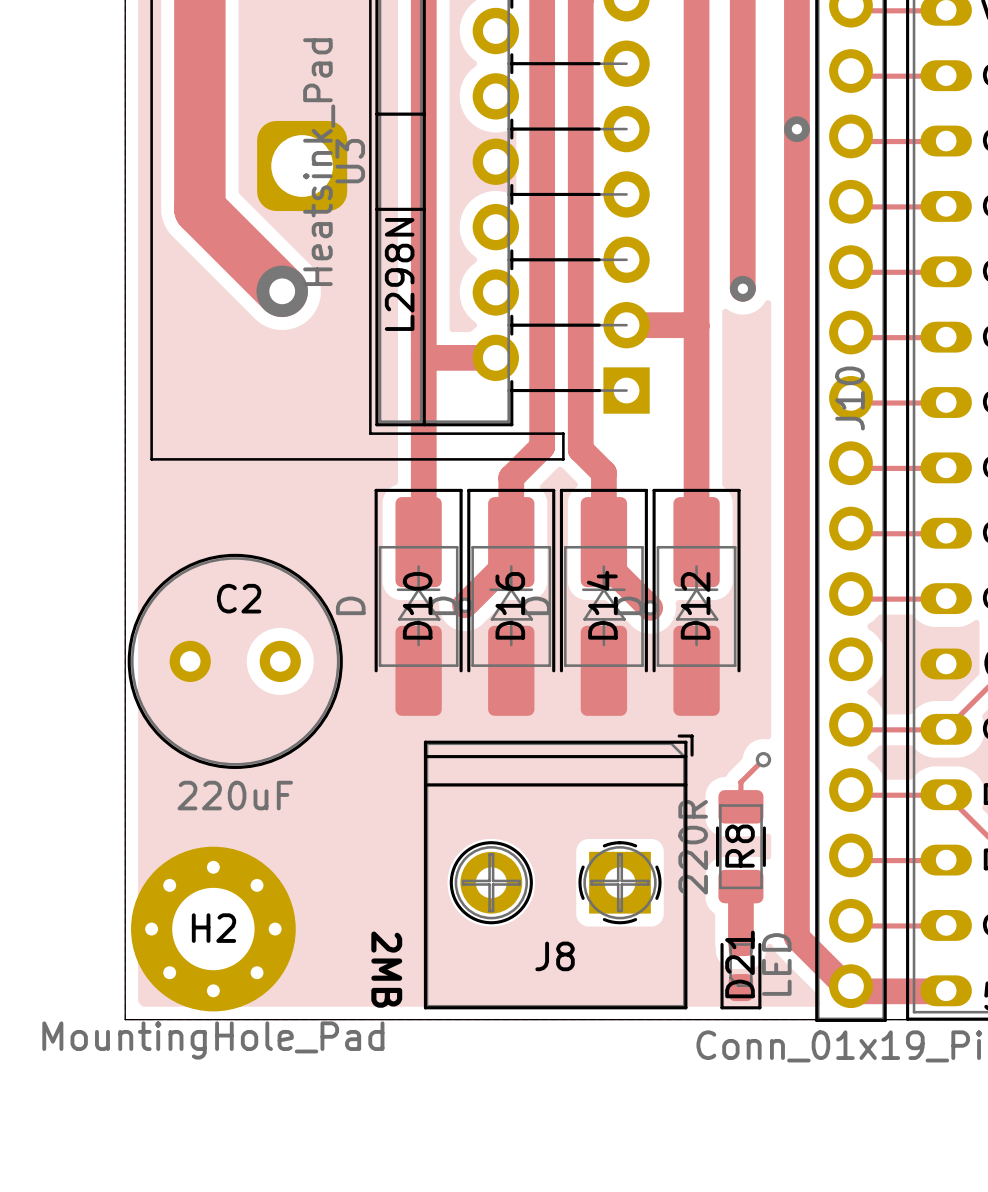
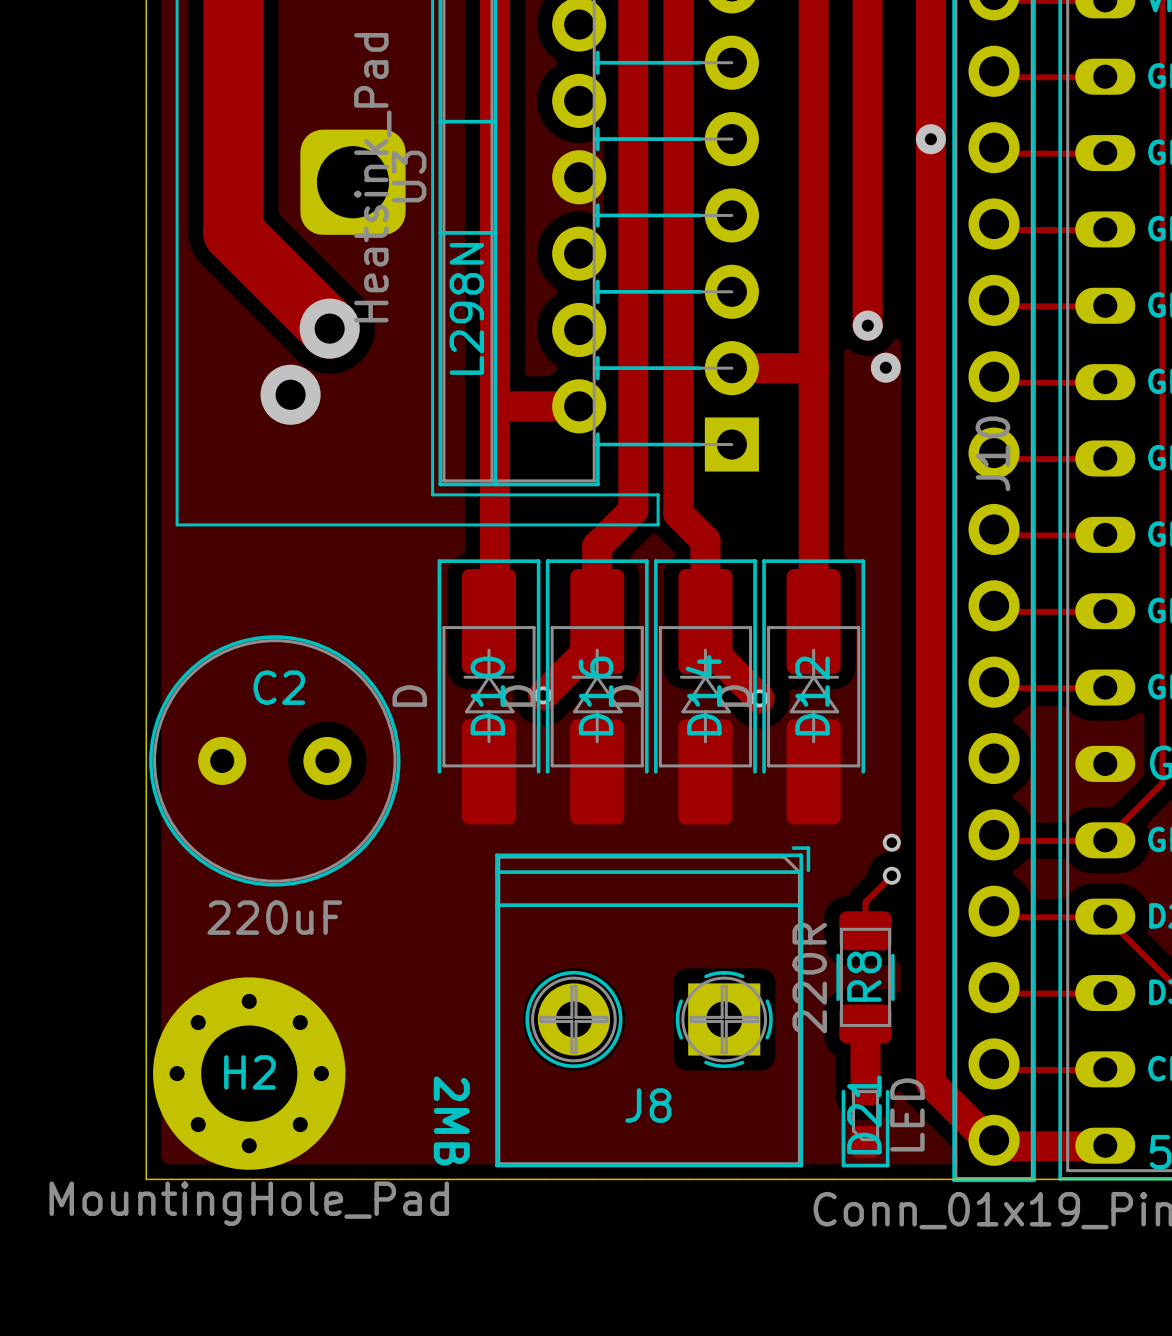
via: none -> (885, 367)
via: none -> (290, 394)
via: none -> (891, 842)

